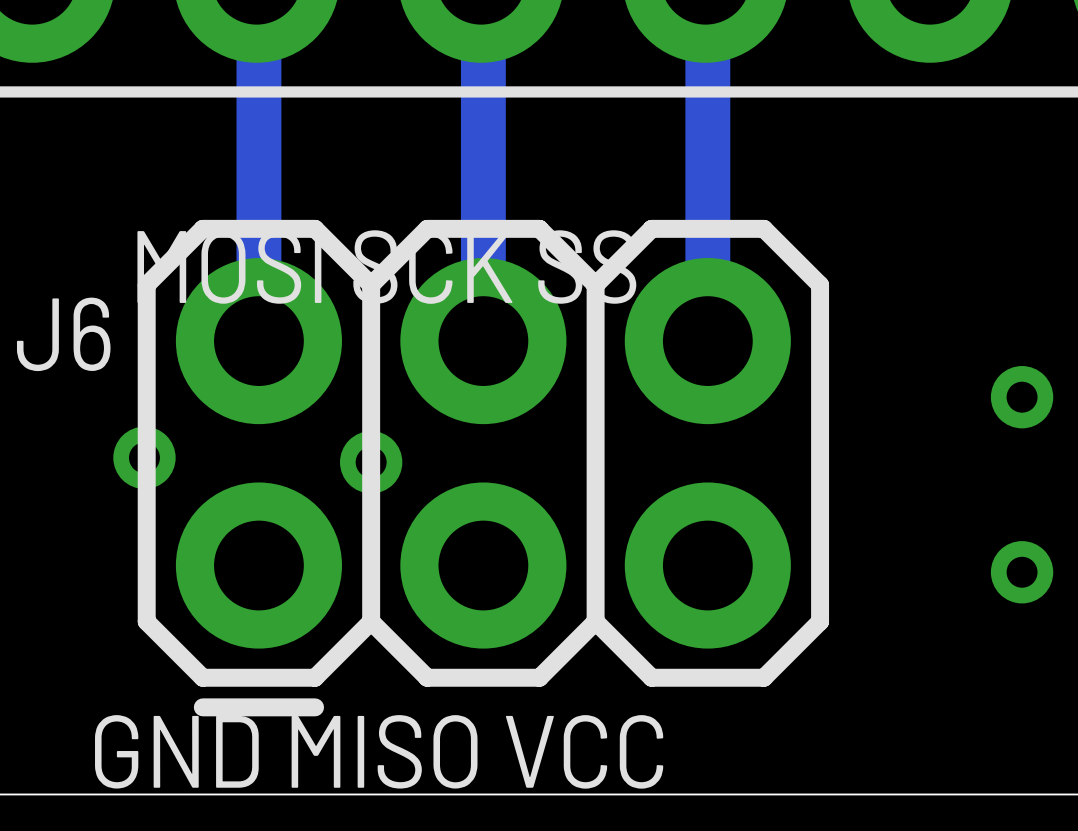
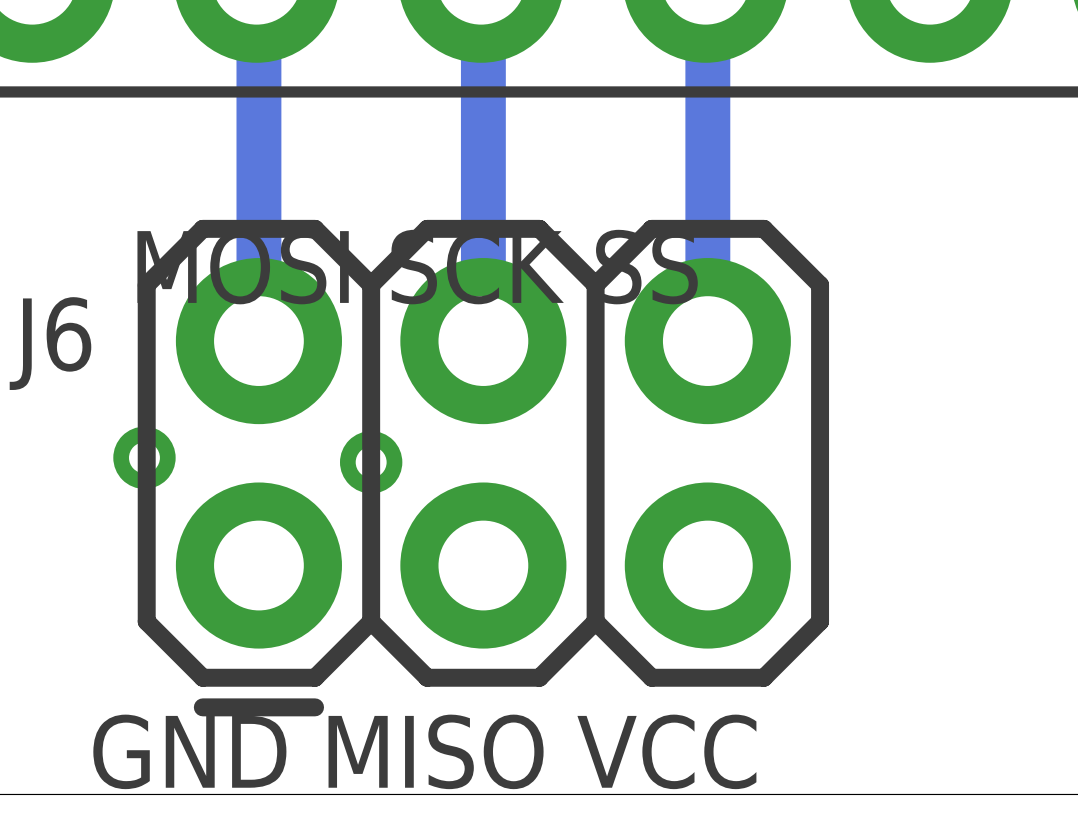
via: (1022, 397) -> none
via: (1022, 572) -> none

